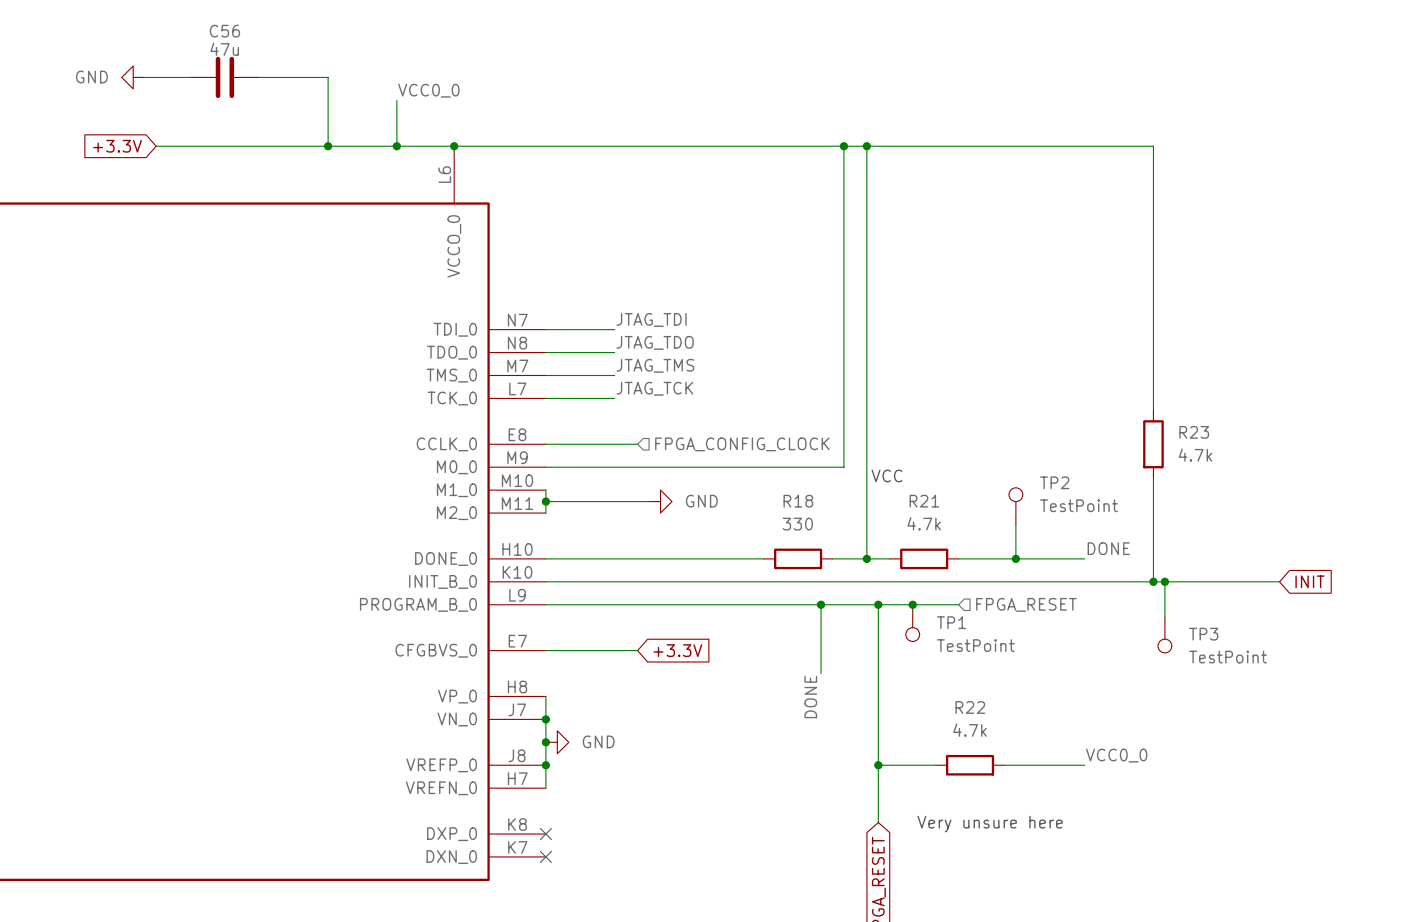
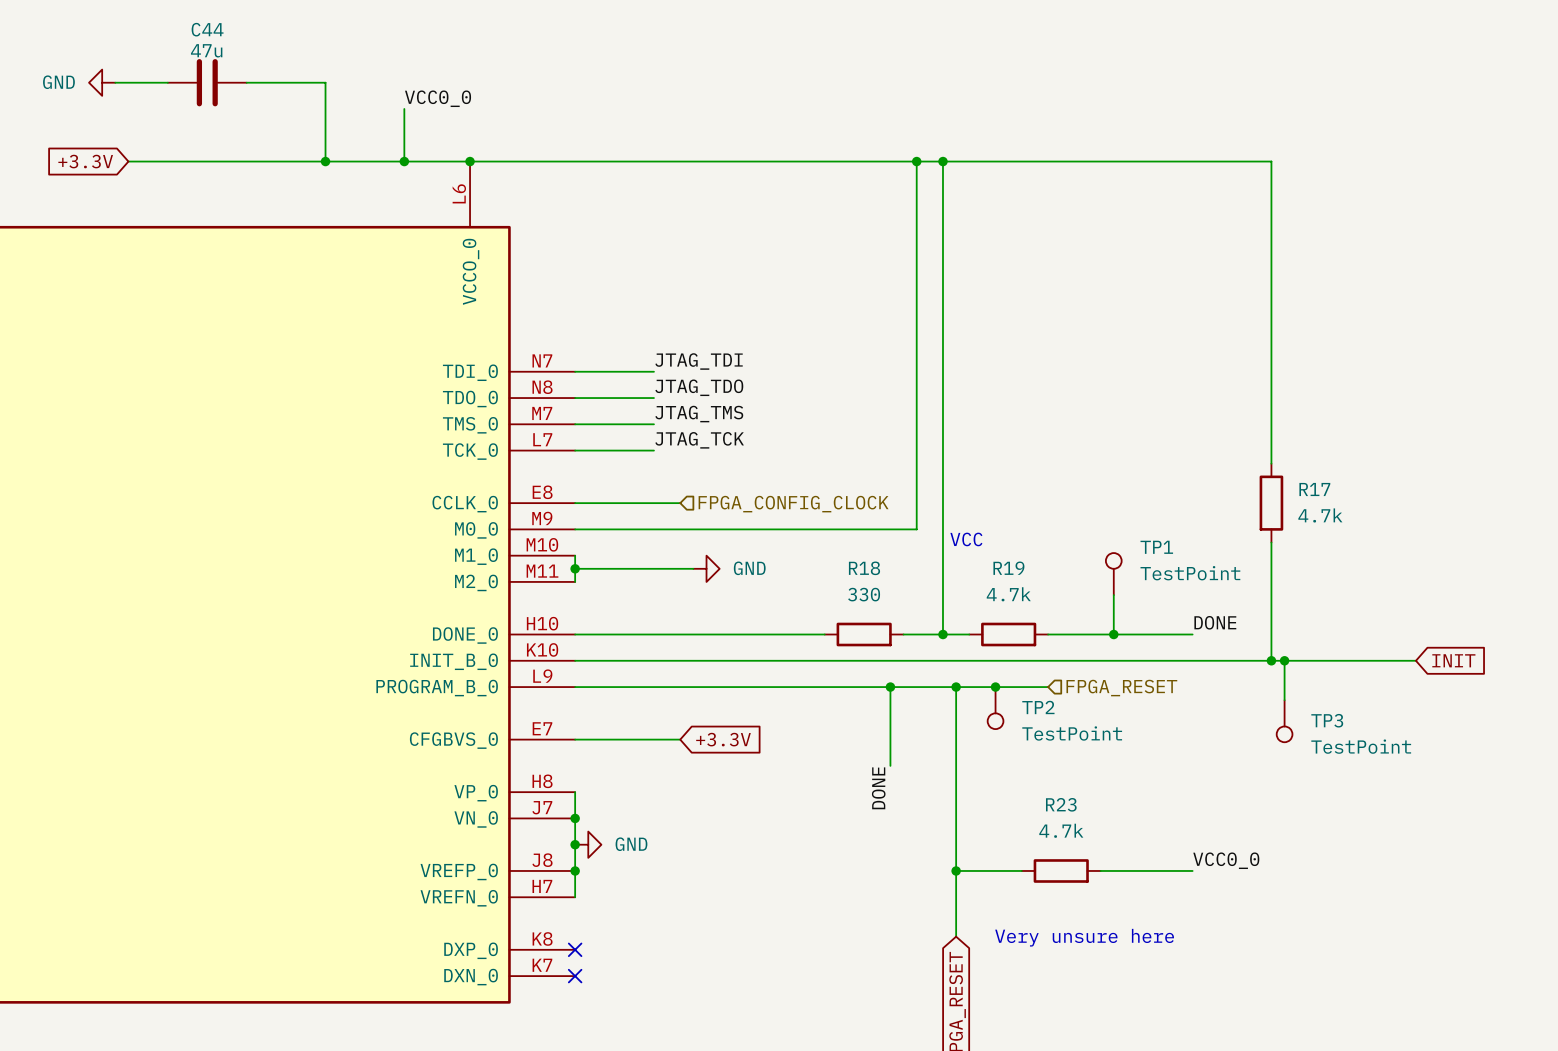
C56 name: C56 (224, 31) -> C44 (207, 29)
R23 name: R23 (1194, 432) -> R17 (1314, 489)
TP2 name: TP2 (1054, 482) -> TP1 (1156, 547)
R21 name: R21 (924, 501) -> R19 (1008, 568)
TP1 name: TP1 (951, 622) -> TP2 (1038, 707)
R22 name: R22 (970, 707) -> R23 (1061, 804)

